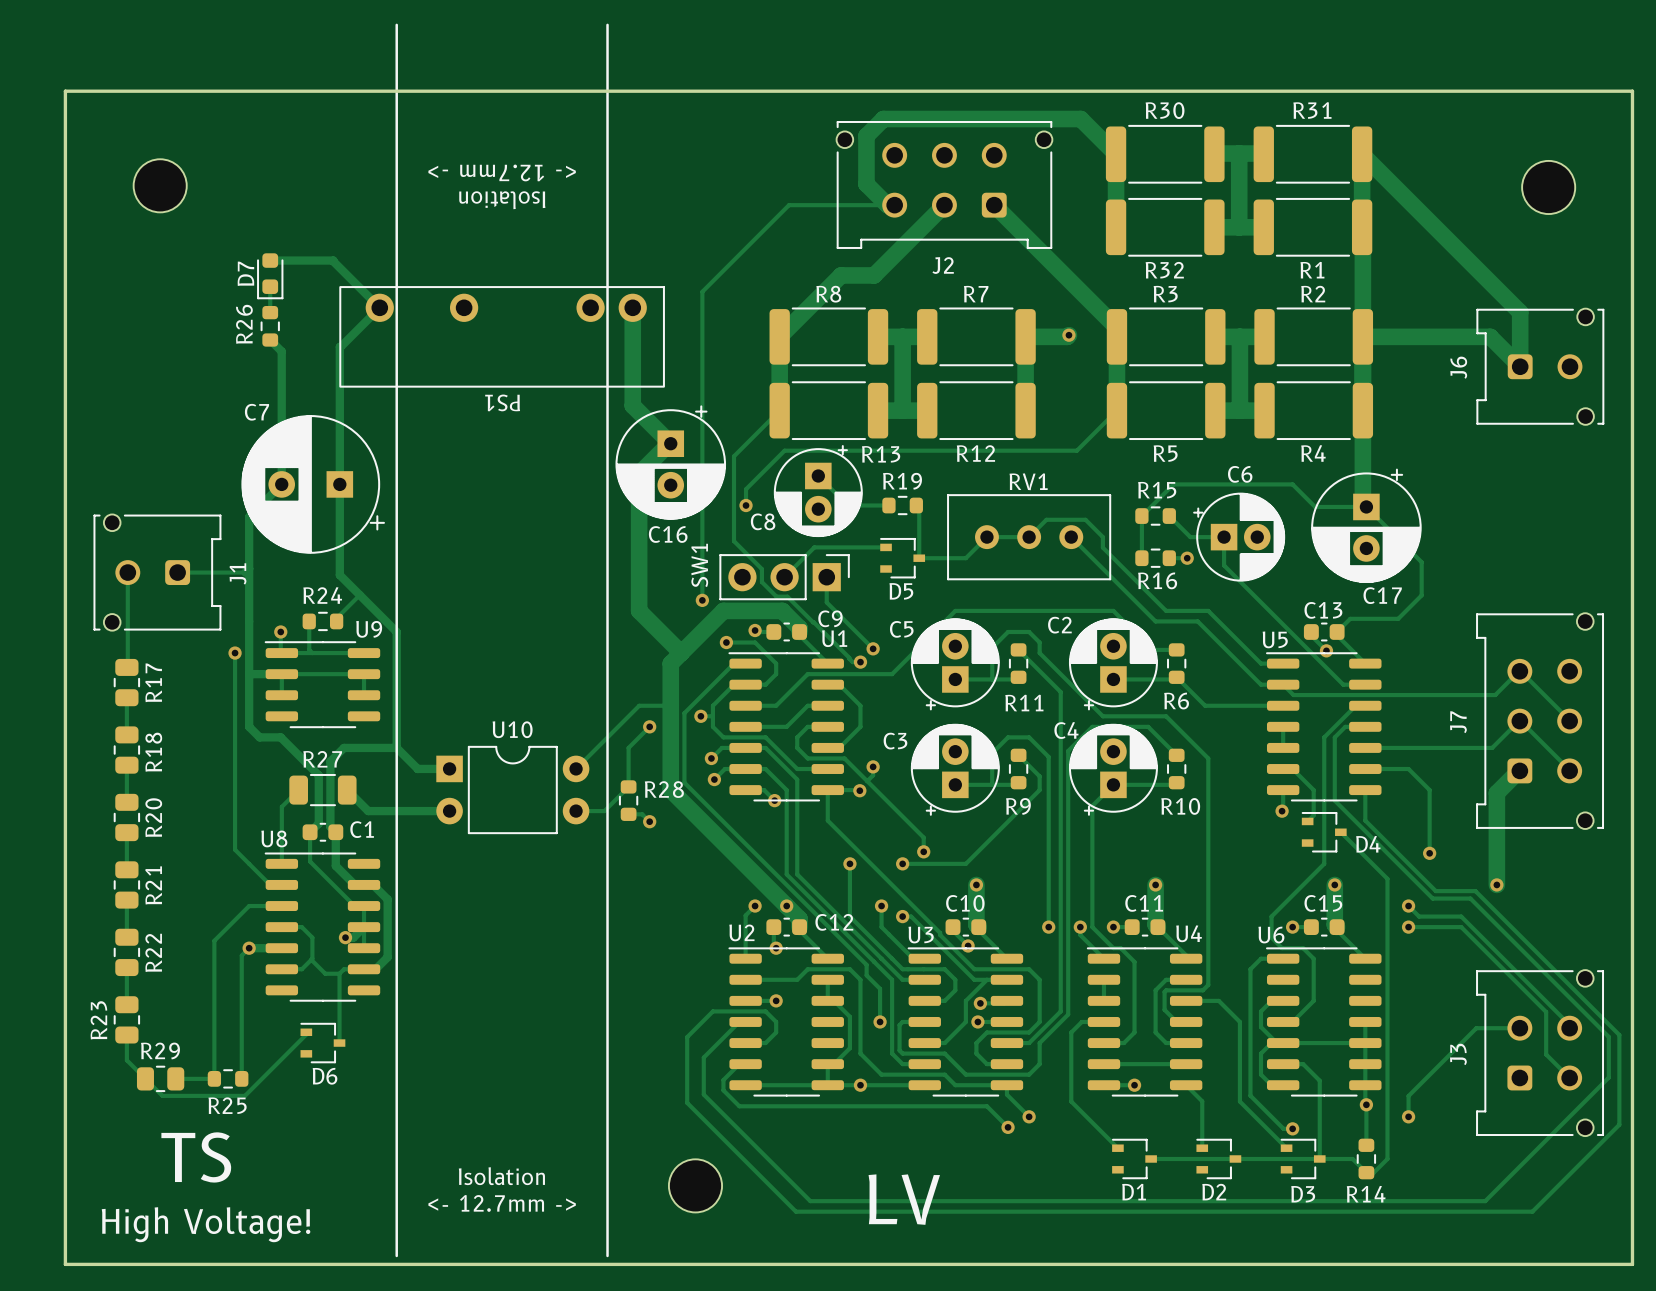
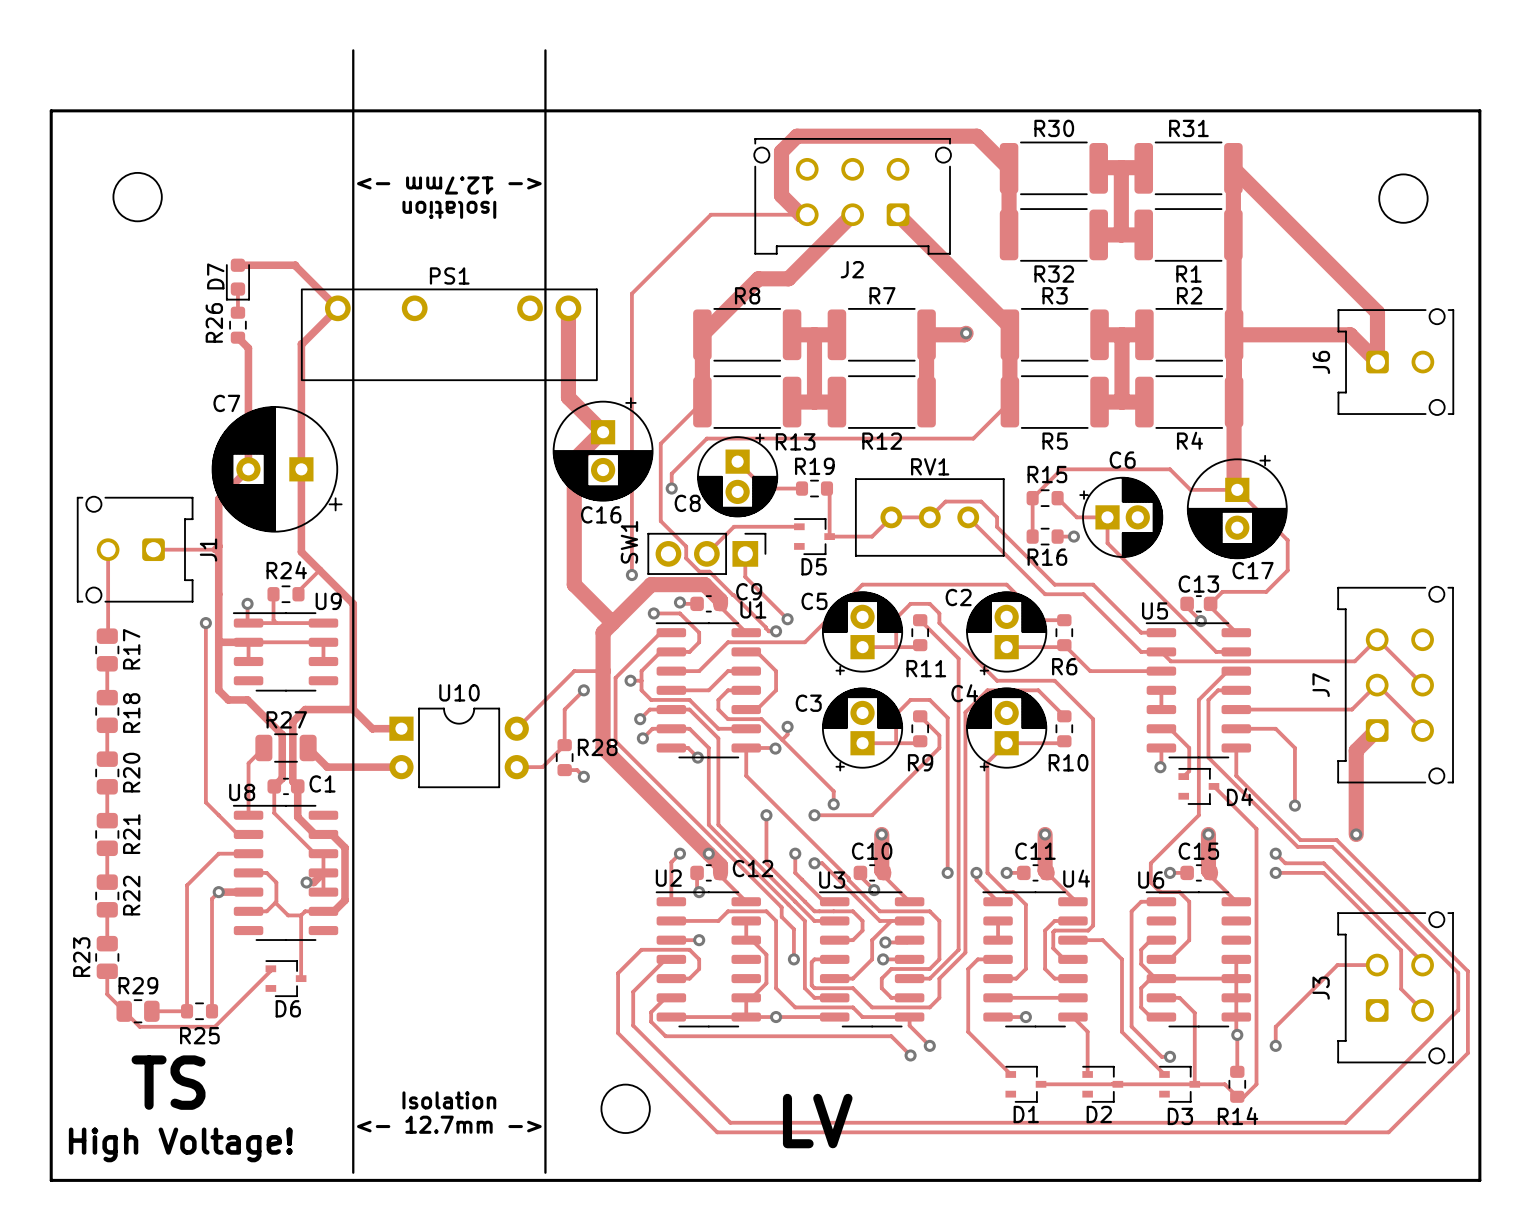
PS1 name rotation: 0° (502, 402) -> 180° (449, 275)
PS1 name position: PS1 (502, 402) -> PS1 (449, 275)

